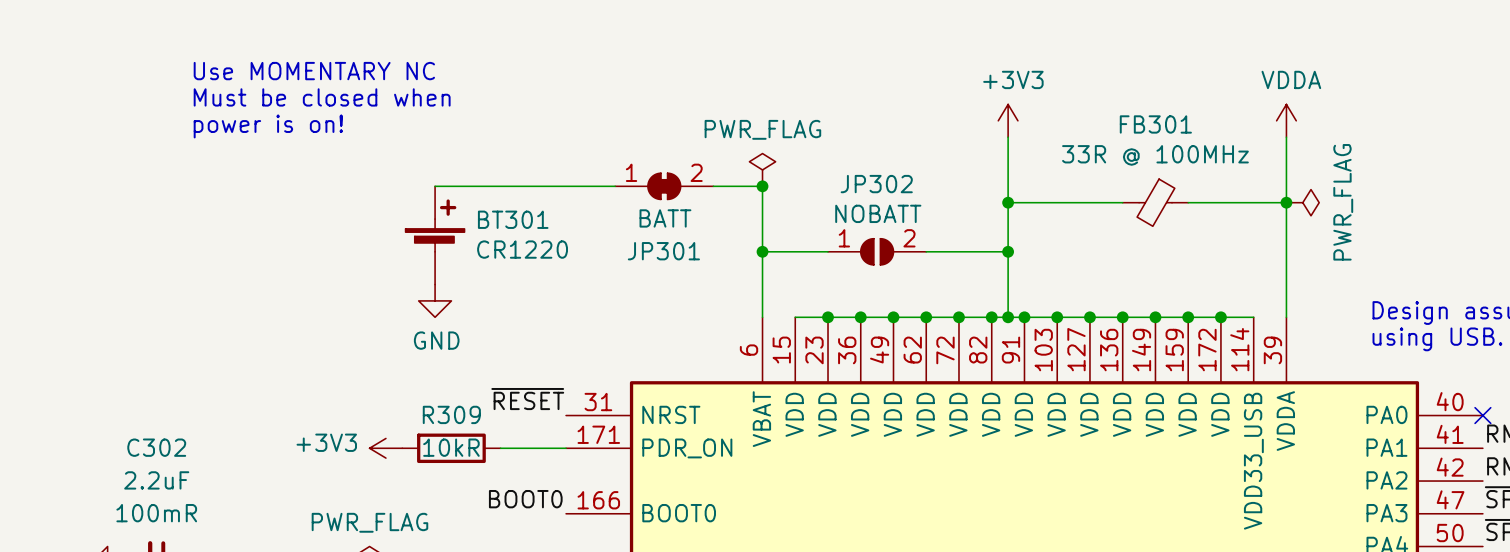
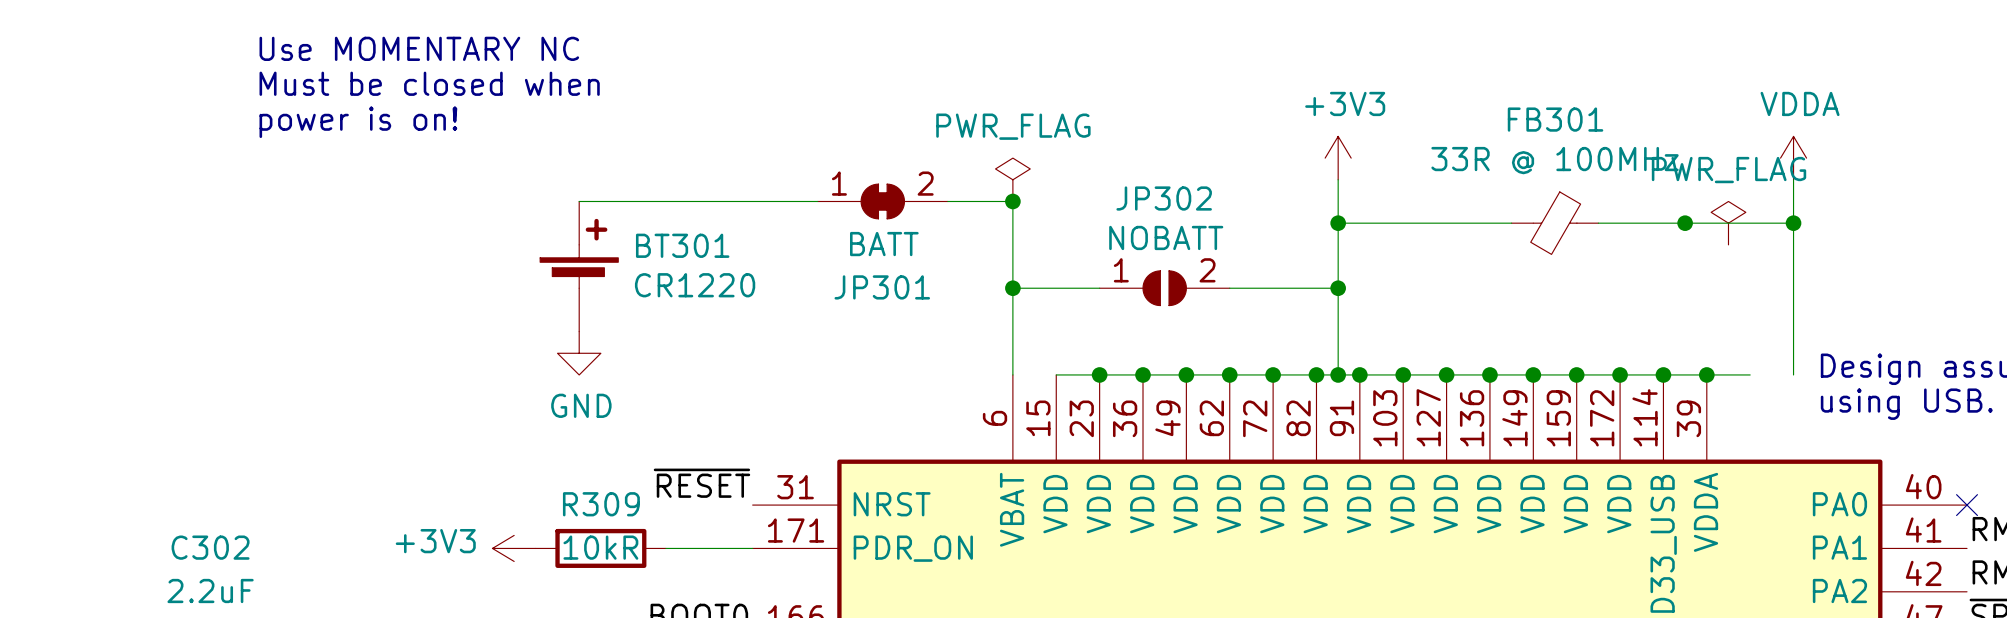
power symbol position: +3V3 (1008, 120) -> +3V3 (1338, 158)
power symbol position: VDDA (1286, 120) -> VDDA (1793, 158)
wire: (1286, 137) (1286, 317) -> none
wire: none -> (1793, 179) (1793, 374)
FB301 position: (1155, 202) -> (1555, 223)
wire: none -> (1706, 223) (1793, 223)
junction position: (1286, 202) -> (1685, 223)
power symbol rotation: 0° (1302, 202) -> 90° counterclockwise (1728, 223)
junction: none -> (1793, 223)
wire: none -> (1663, 374) (1750, 374)
junction: none -> (1663, 374)
junction: none -> (1706, 374)

